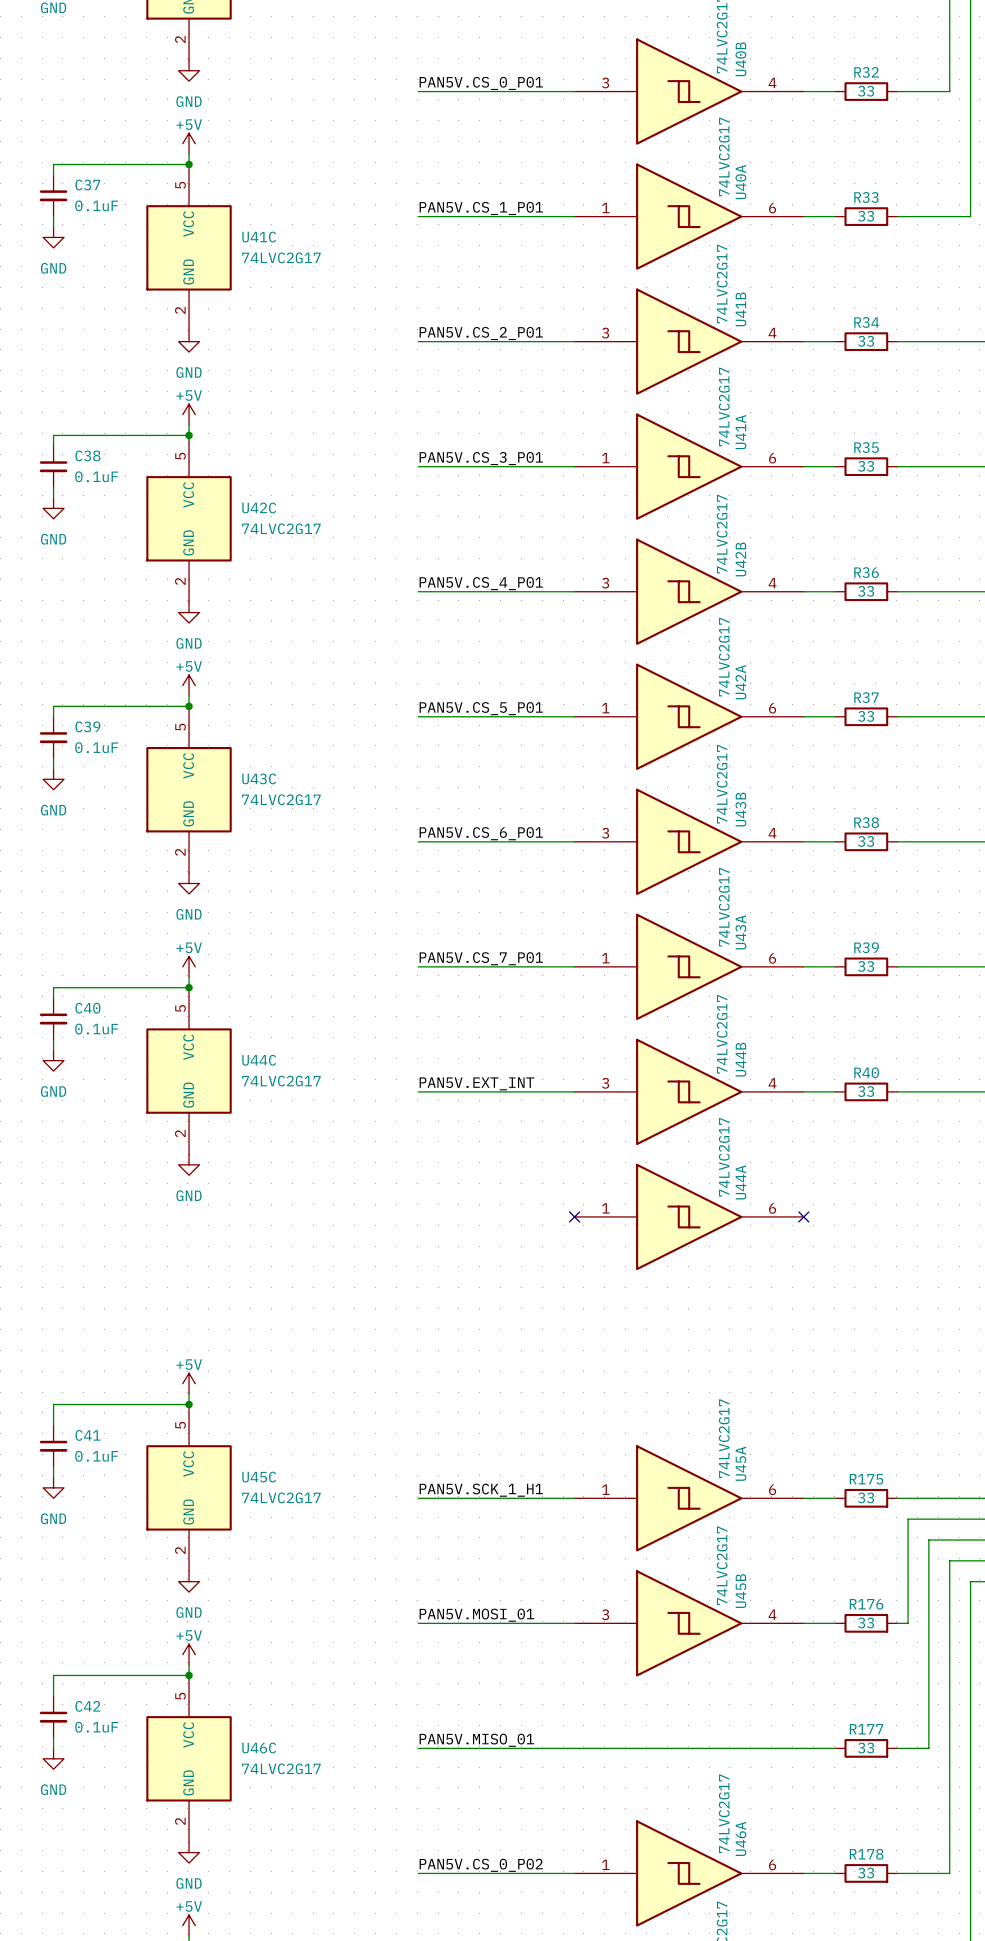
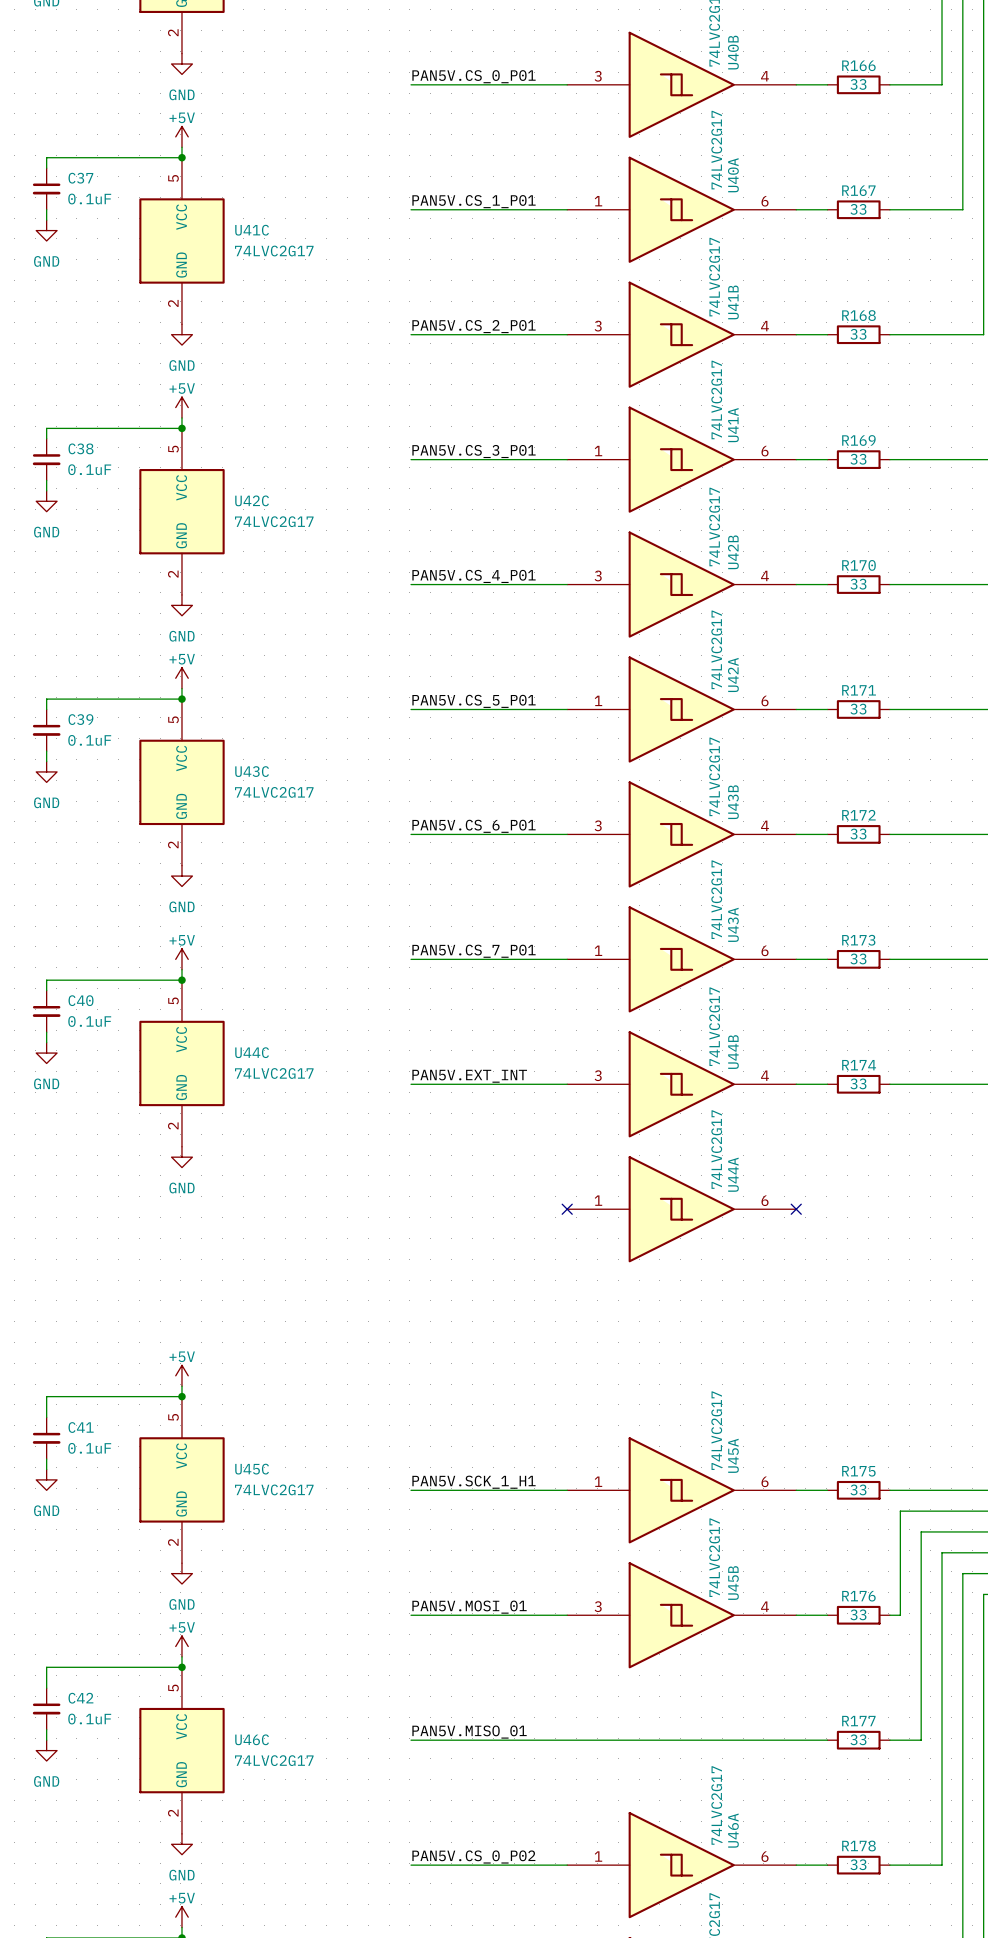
R32 name: R32 (866, 72) -> R166 (858, 65)
R33 name: R33 (866, 197) -> R167 (858, 190)
R34 name: R34 (866, 322) -> R168 (858, 315)
R35 name: R35 (866, 447) -> R169 (858, 440)
R36 name: R36 (866, 572) -> R170 (858, 565)
R37 name: R37 (866, 697) -> R171 (859, 690)
R38 name: R38 (866, 822) -> R172 (858, 815)
R39 name: R39 (866, 947) -> R173 (858, 940)
R40 name: R40 (866, 1072) -> R174 (859, 1065)

